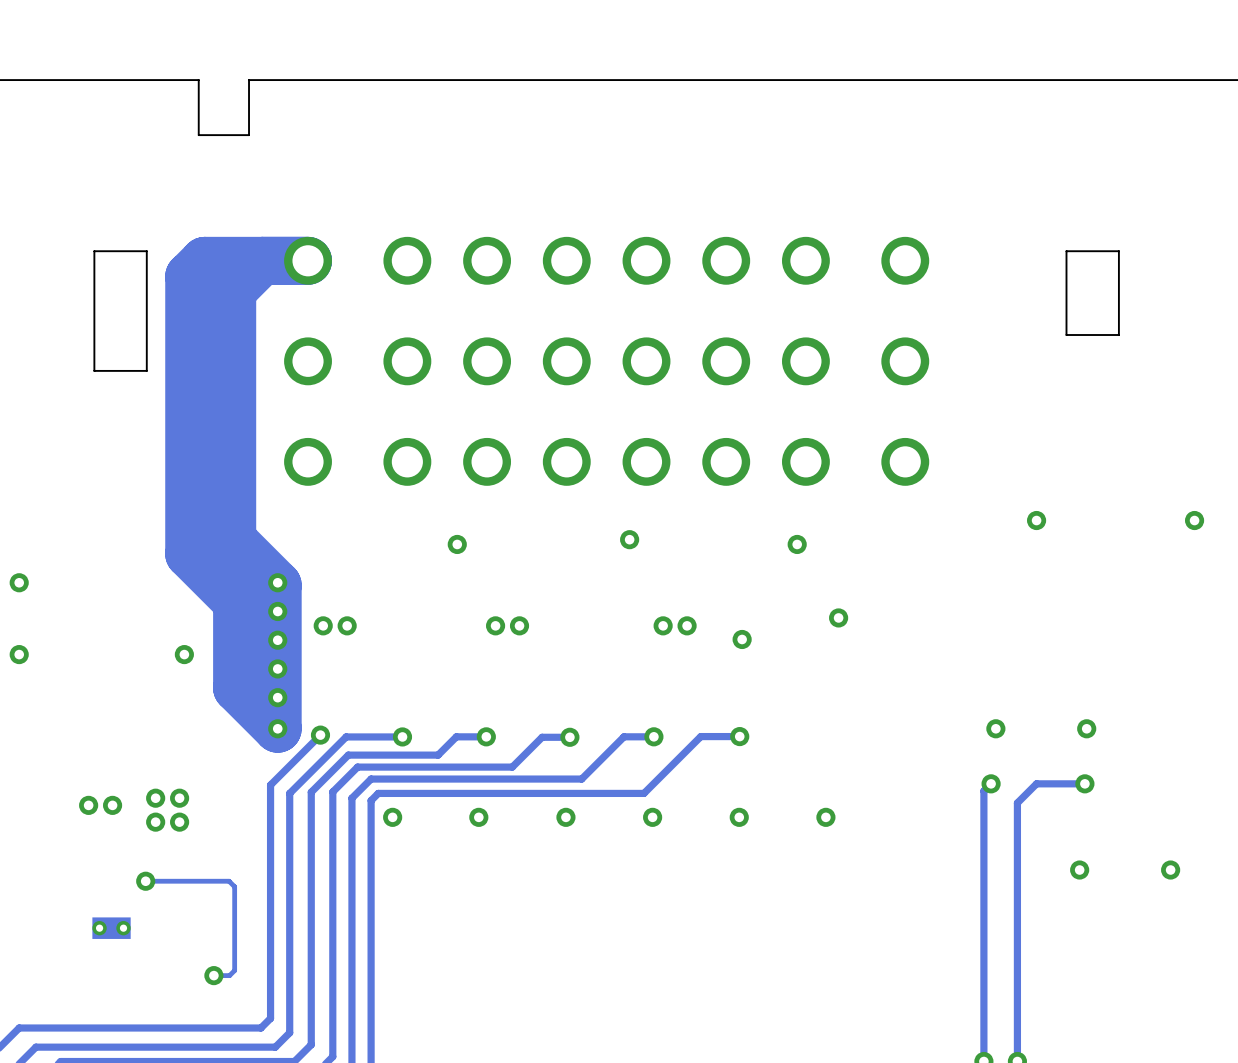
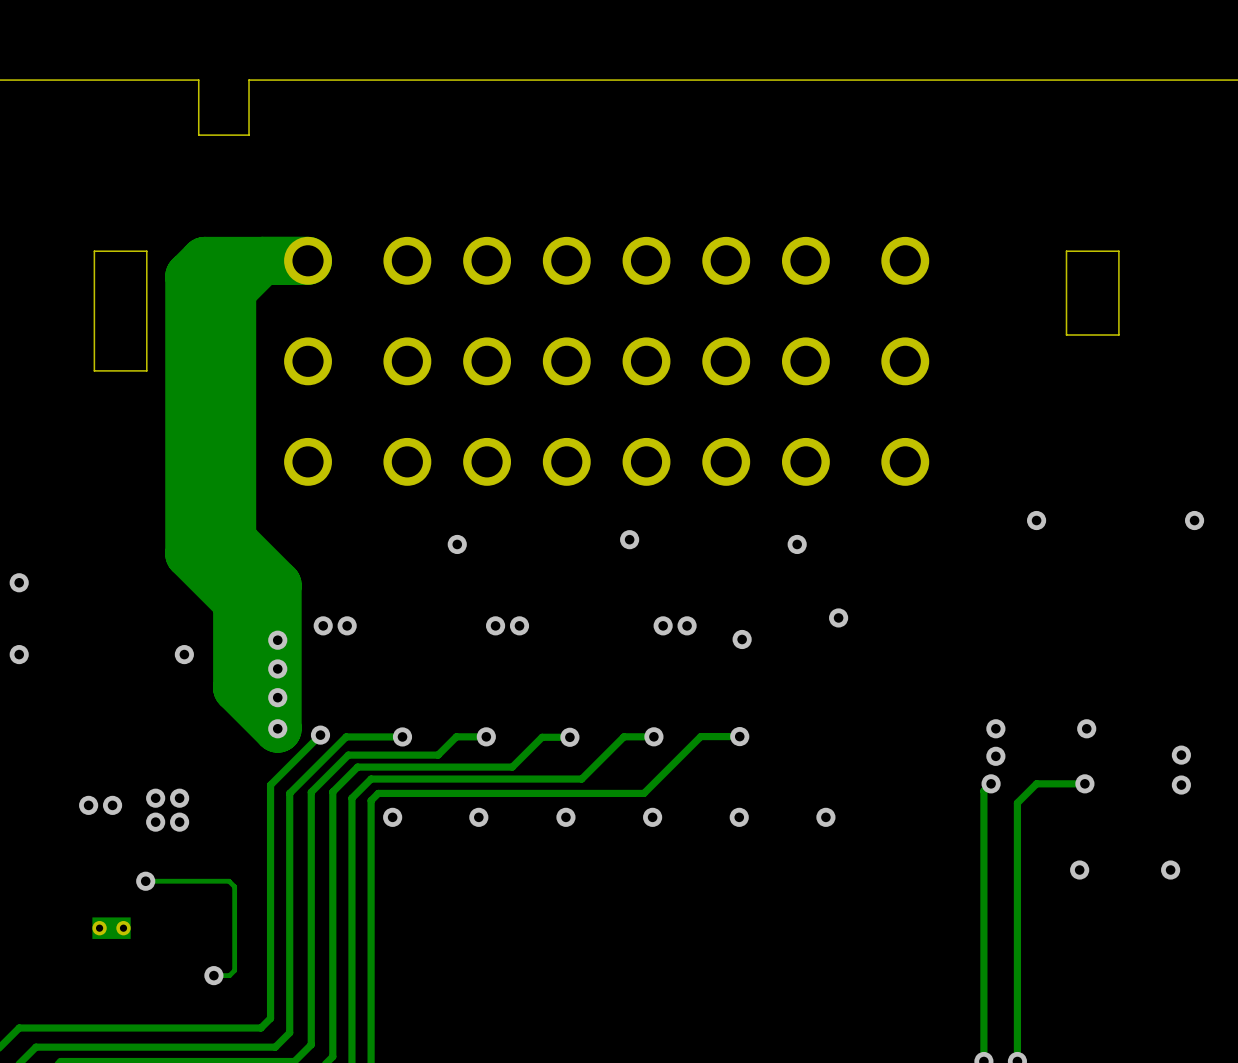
via: (277, 582) -> none
via: (277, 611) -> none
via: none -> (1181, 755)
via: none -> (995, 756)
via: none -> (1181, 785)

